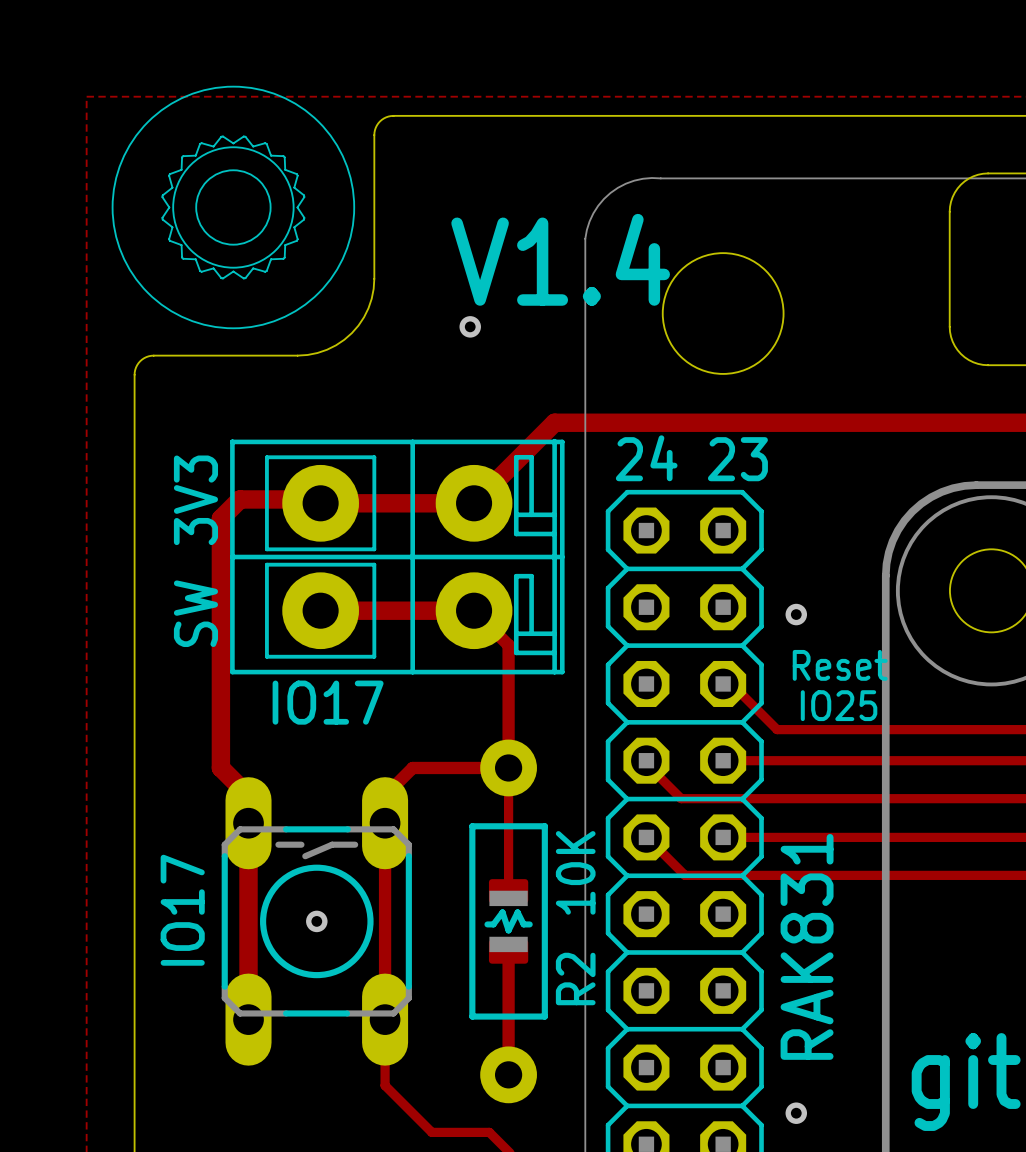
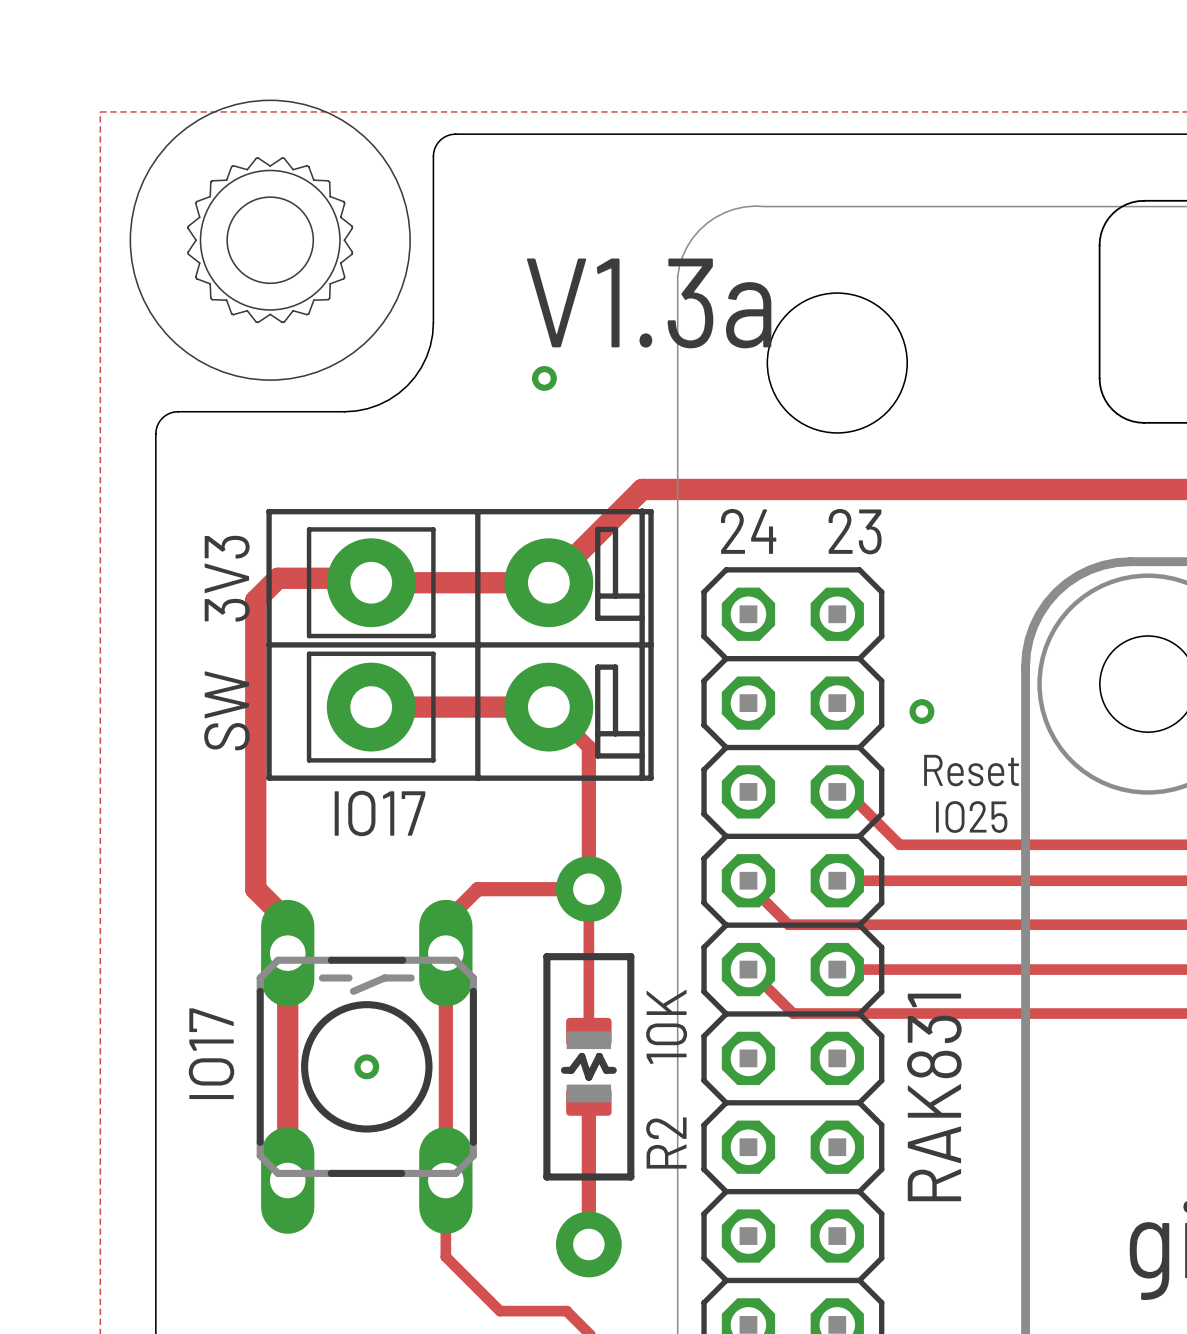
text: V1.4 (560, 259) -> V1.3a (649, 303)
via: (796, 1113) -> none

